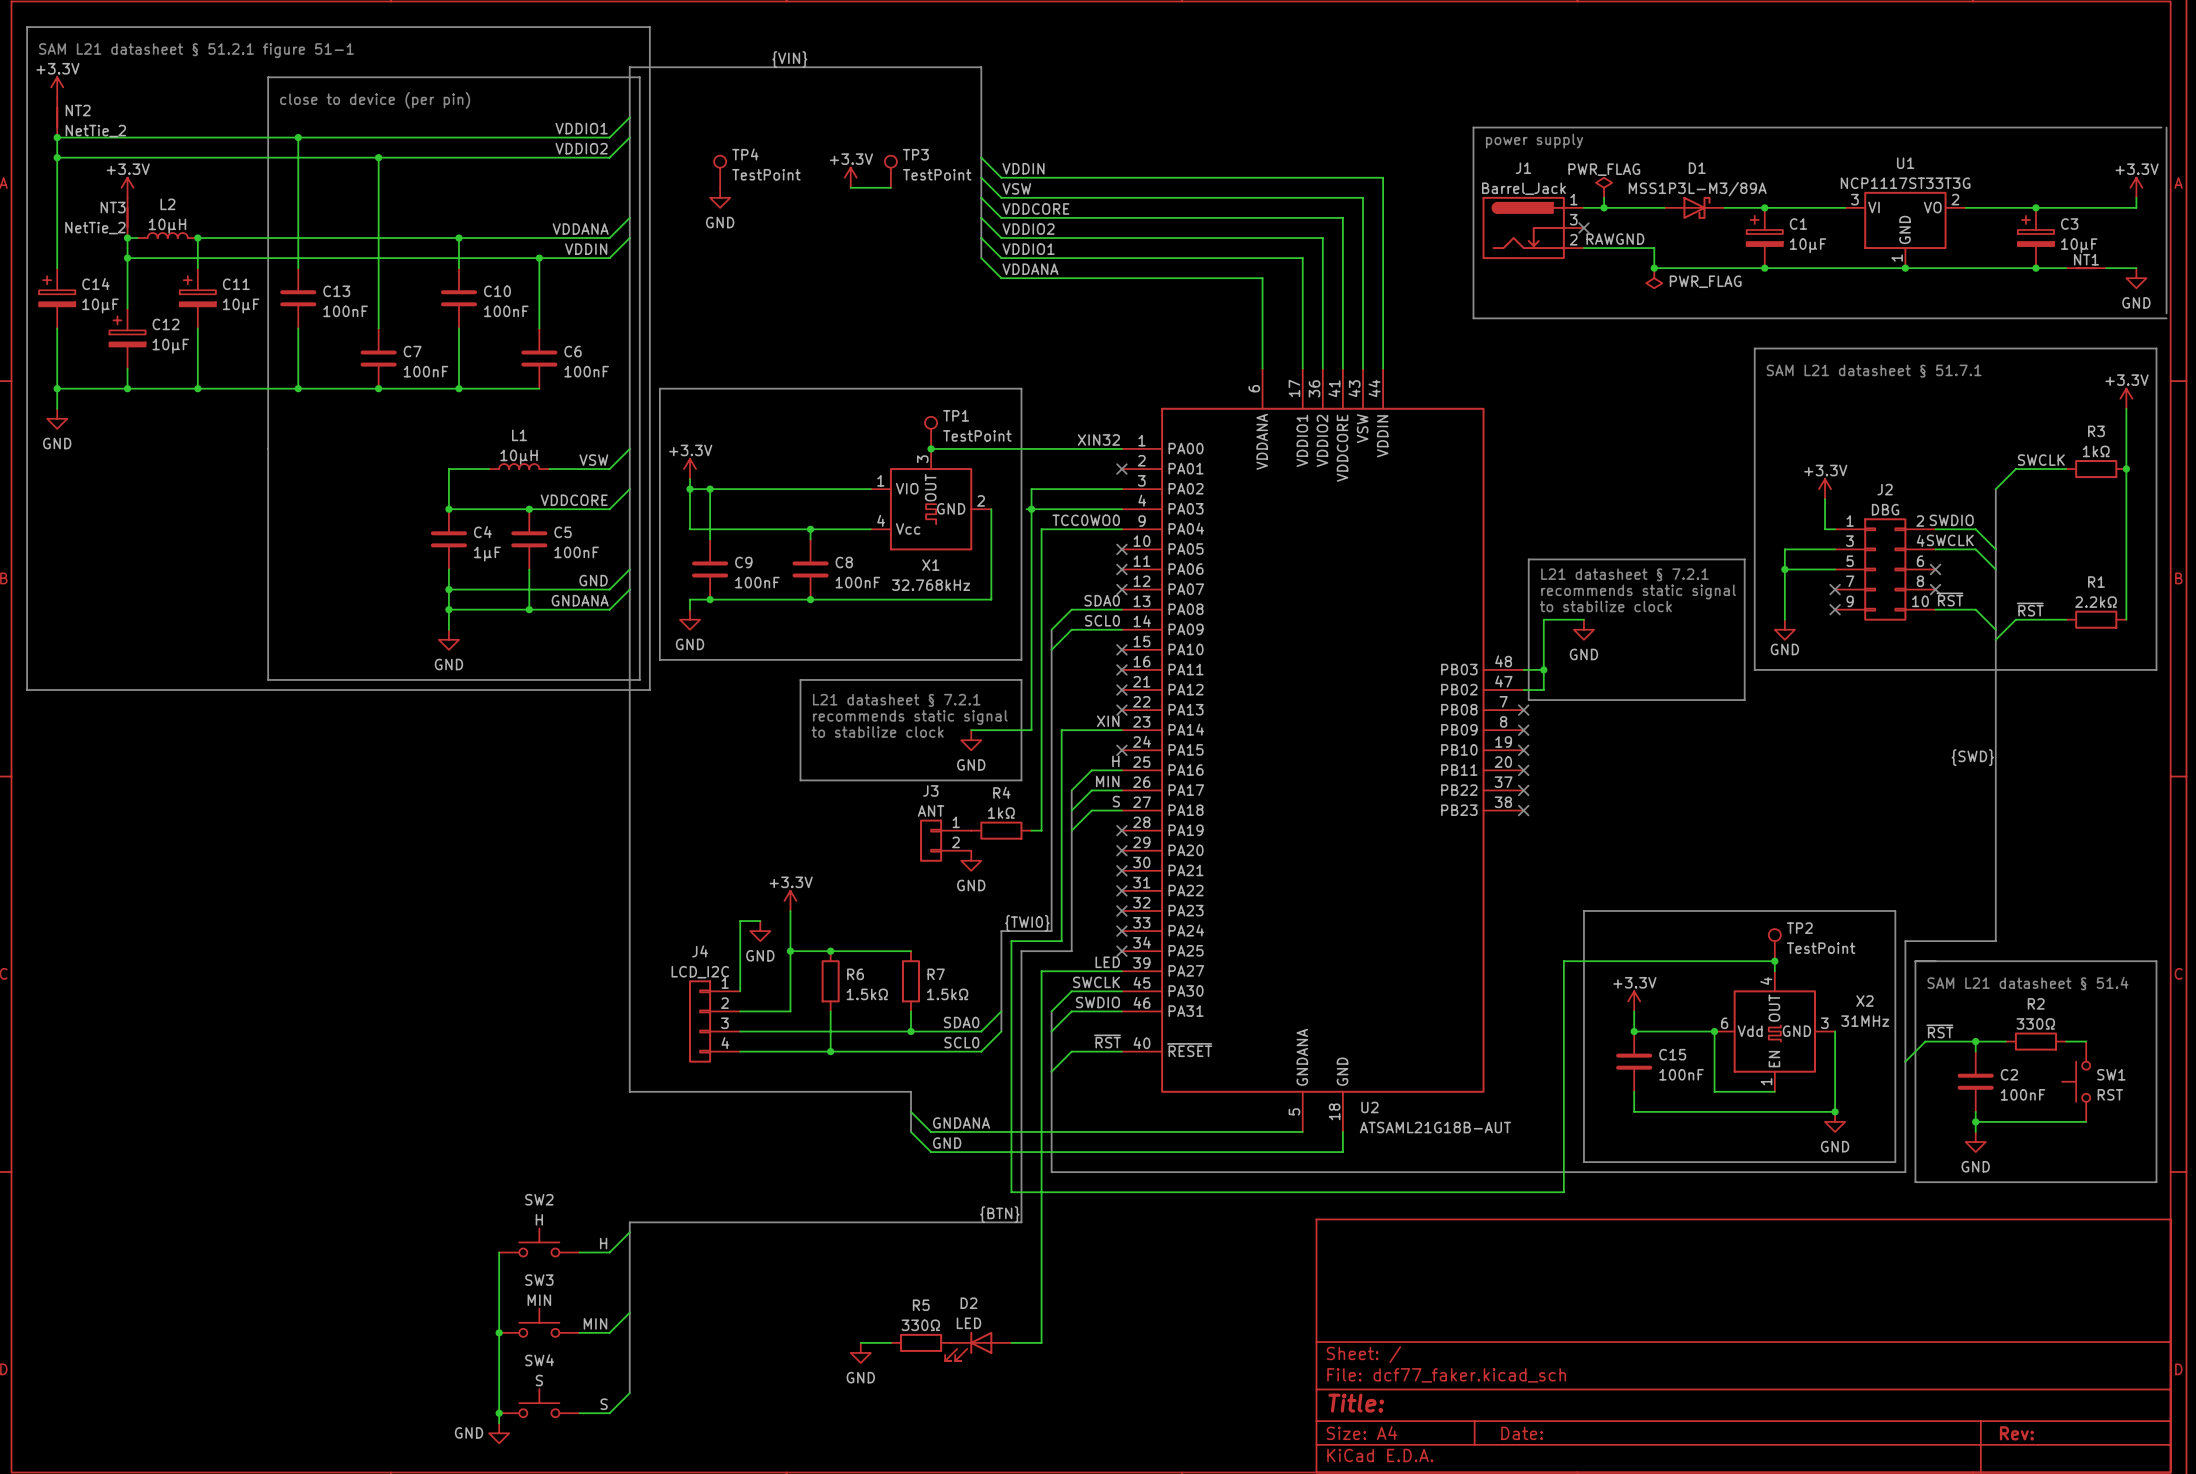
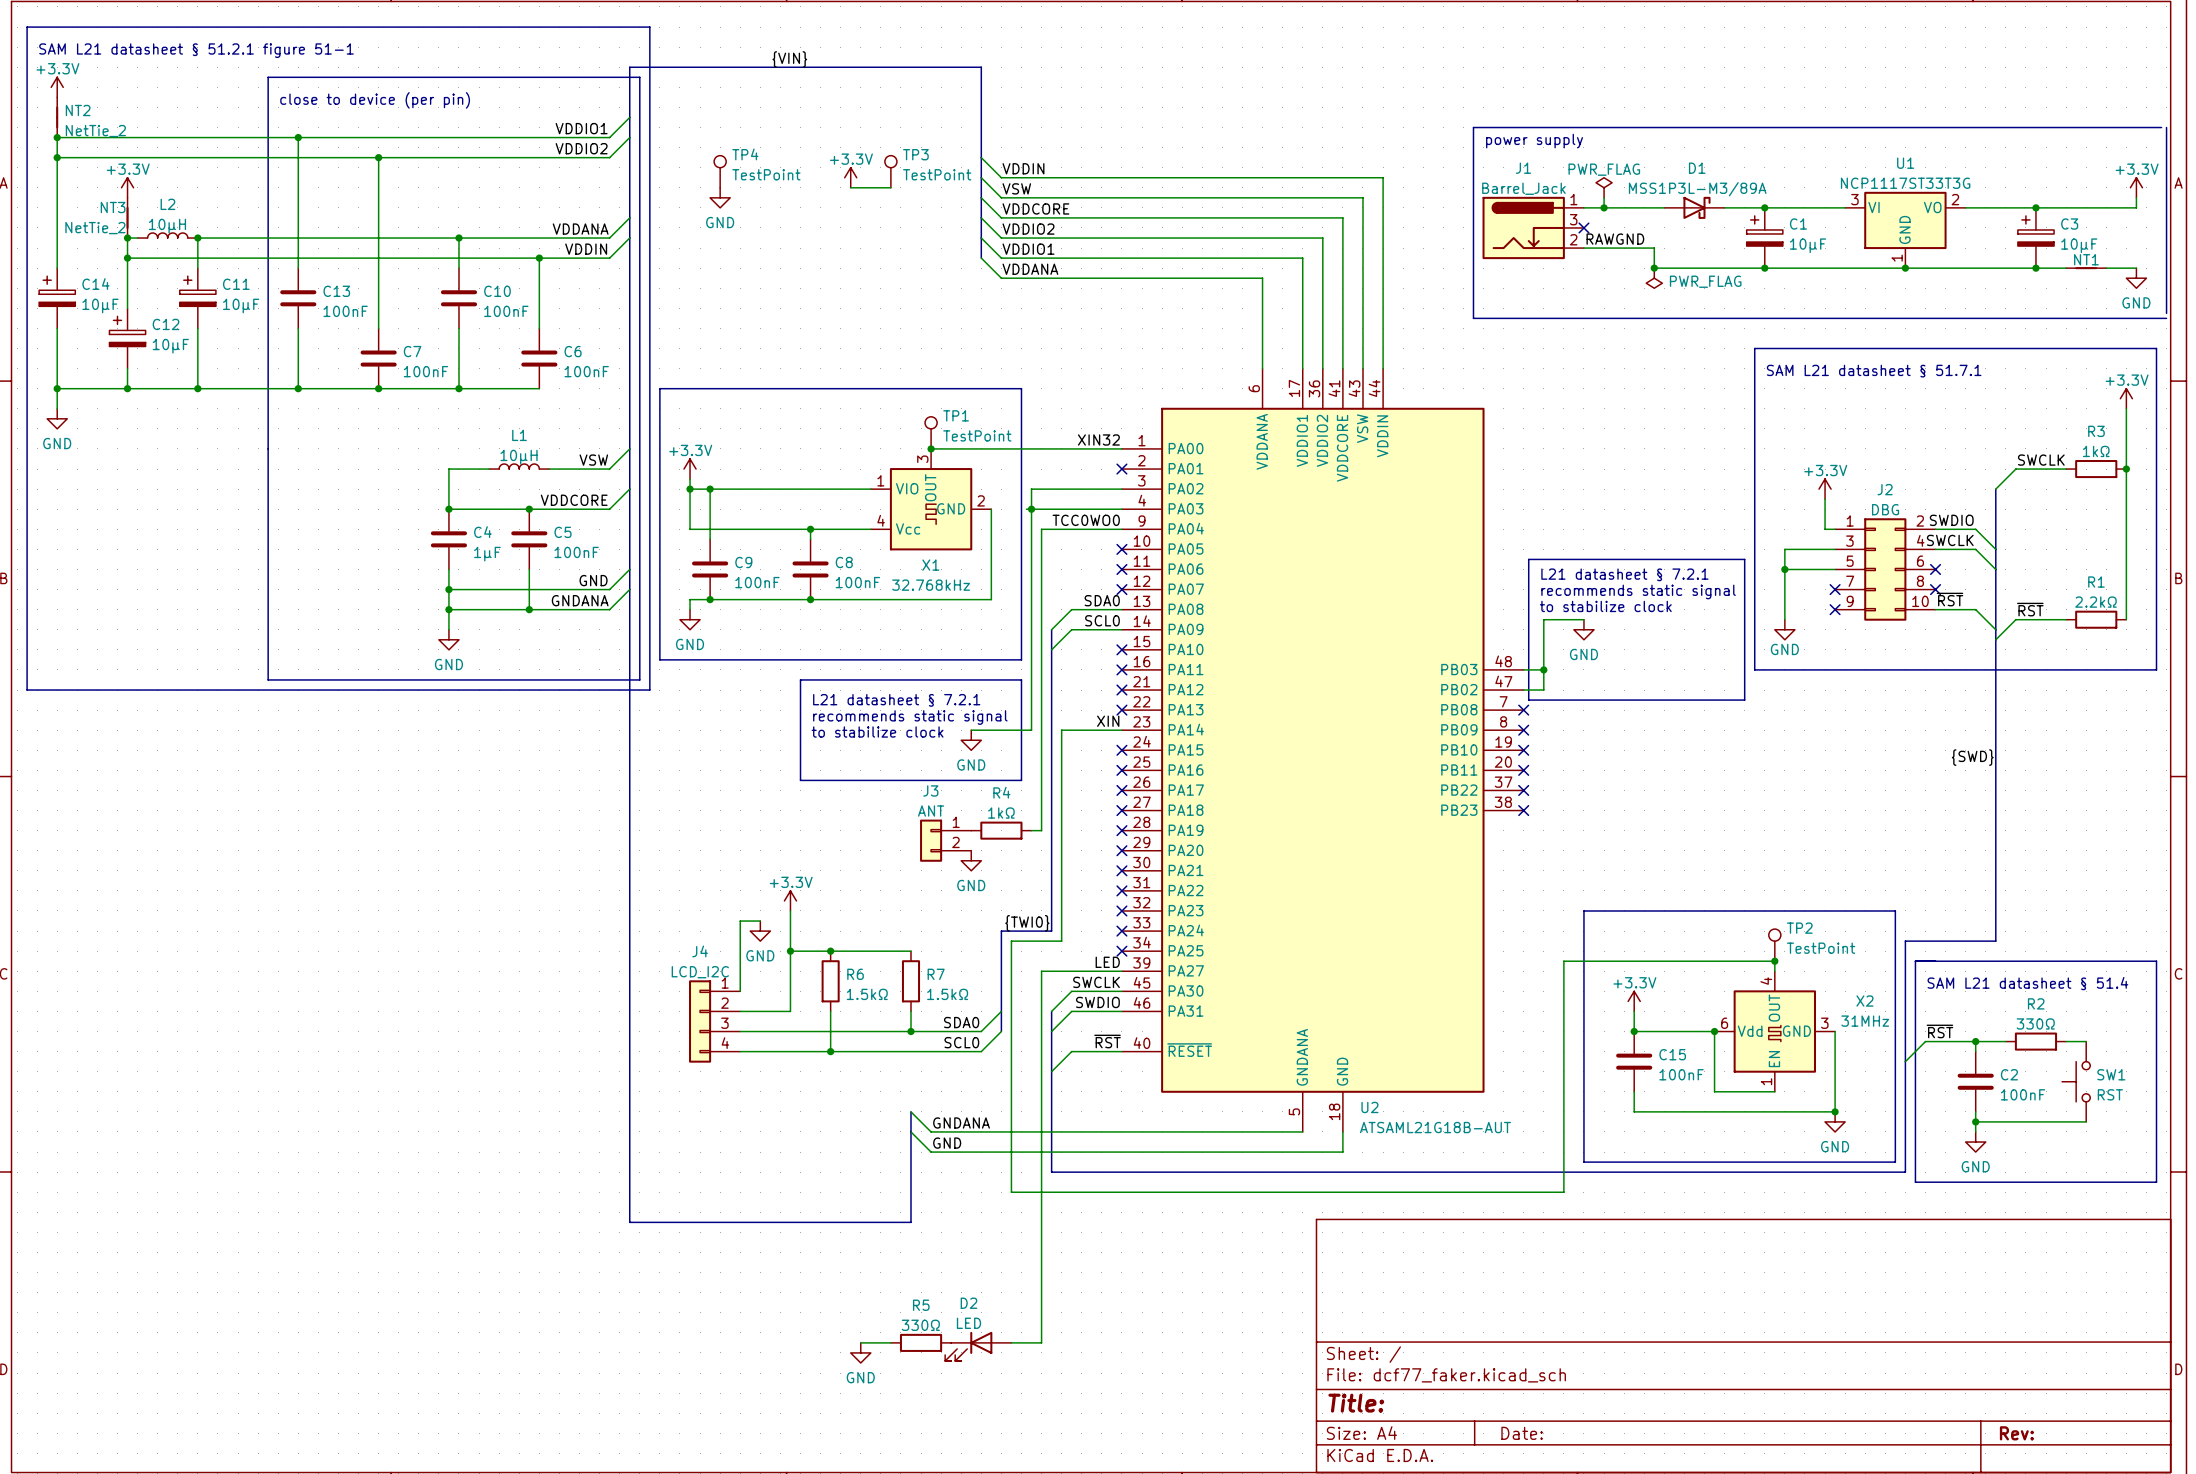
label: H (1115, 761) -> none
wire: (1121, 770) (1091, 770) (1071, 790) -> none
no-connect mark: none -> (1121, 770)
label: MIN (1107, 781) -> none
bus: (1071, 790) (1071, 951) (1021, 951) (1021, 1222) (910, 1222) -> (910, 1131) (910, 1222)
wire: (1121, 790) (1091, 790) (1071, 810) -> none
no-connect mark: none -> (1121, 790)
label: S (1116, 801) -> none
wire: (1121, 810) (1091, 810) (1071, 830) -> none
no-connect mark: none -> (1121, 810)
bus: (629, 1091) (910, 1091) (910, 1111) -> none
label: {BTN} (999, 1214) -> none
bus: (629, 1222) (629, 1393) -> (629, 1222) (629, 1091)
wire: (629, 1232) (609, 1252) (579, 1252) -> none
SW2: H (539, 1242) -> none
label: H (603, 1243) -> none
wire: (499, 1252) (499, 1423) -> none
wire: (629, 1312) (609, 1332) (579, 1332) -> none
SW3: MIN (539, 1322) -> none
label: MIN (595, 1323) -> none
junction: (499, 1332) -> none
wire: (629, 1393) (609, 1413) (579, 1413) -> none
SW4: S (539, 1403) -> none
label: S (604, 1404) -> none
junction: (499, 1413) -> none
power symbol: GND (499, 1433) -> none

